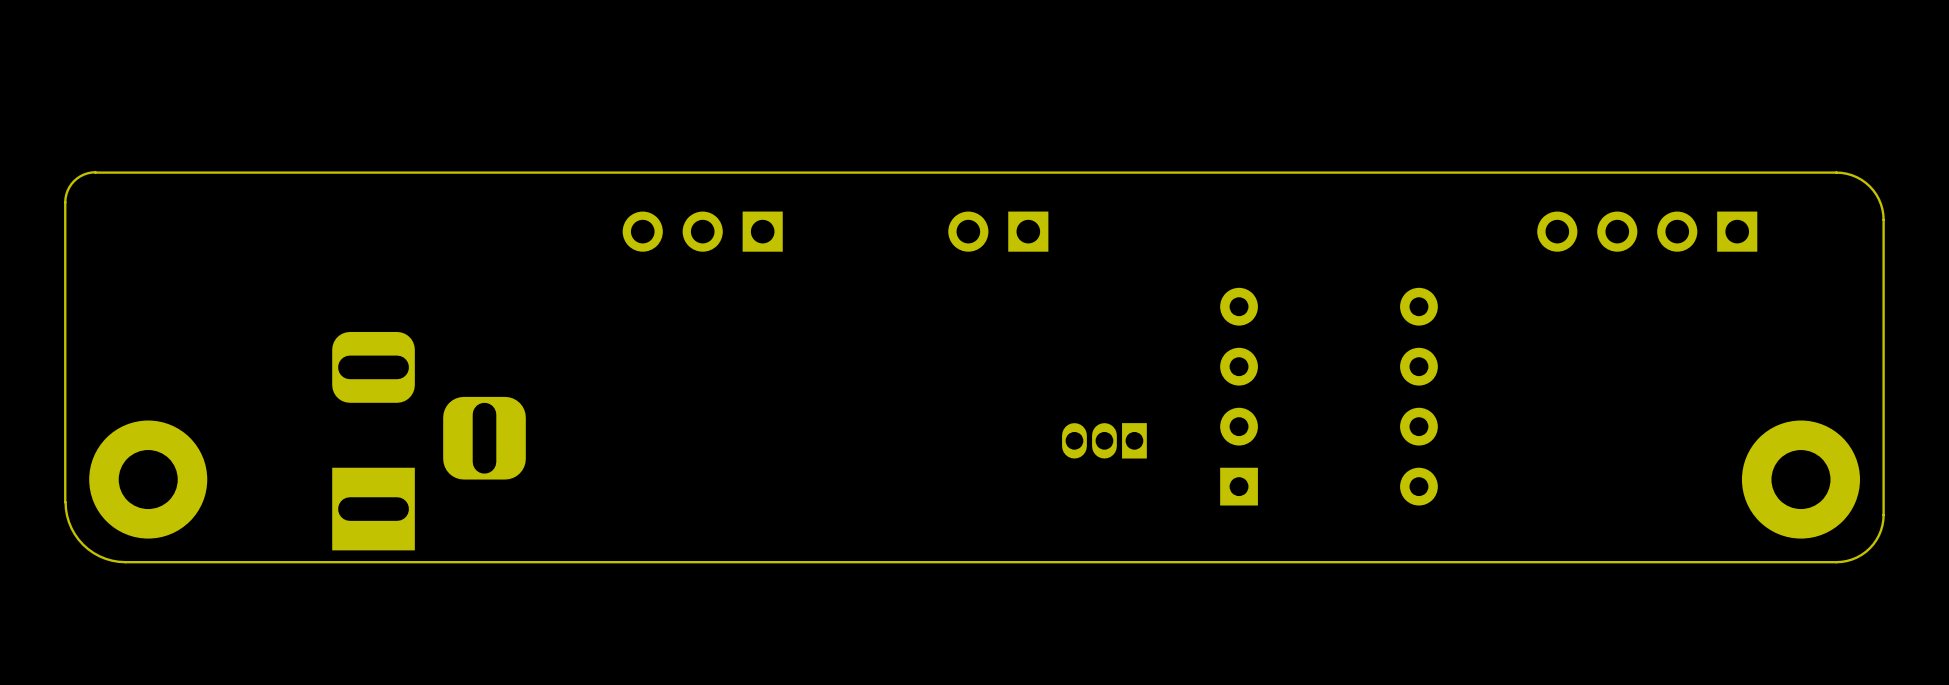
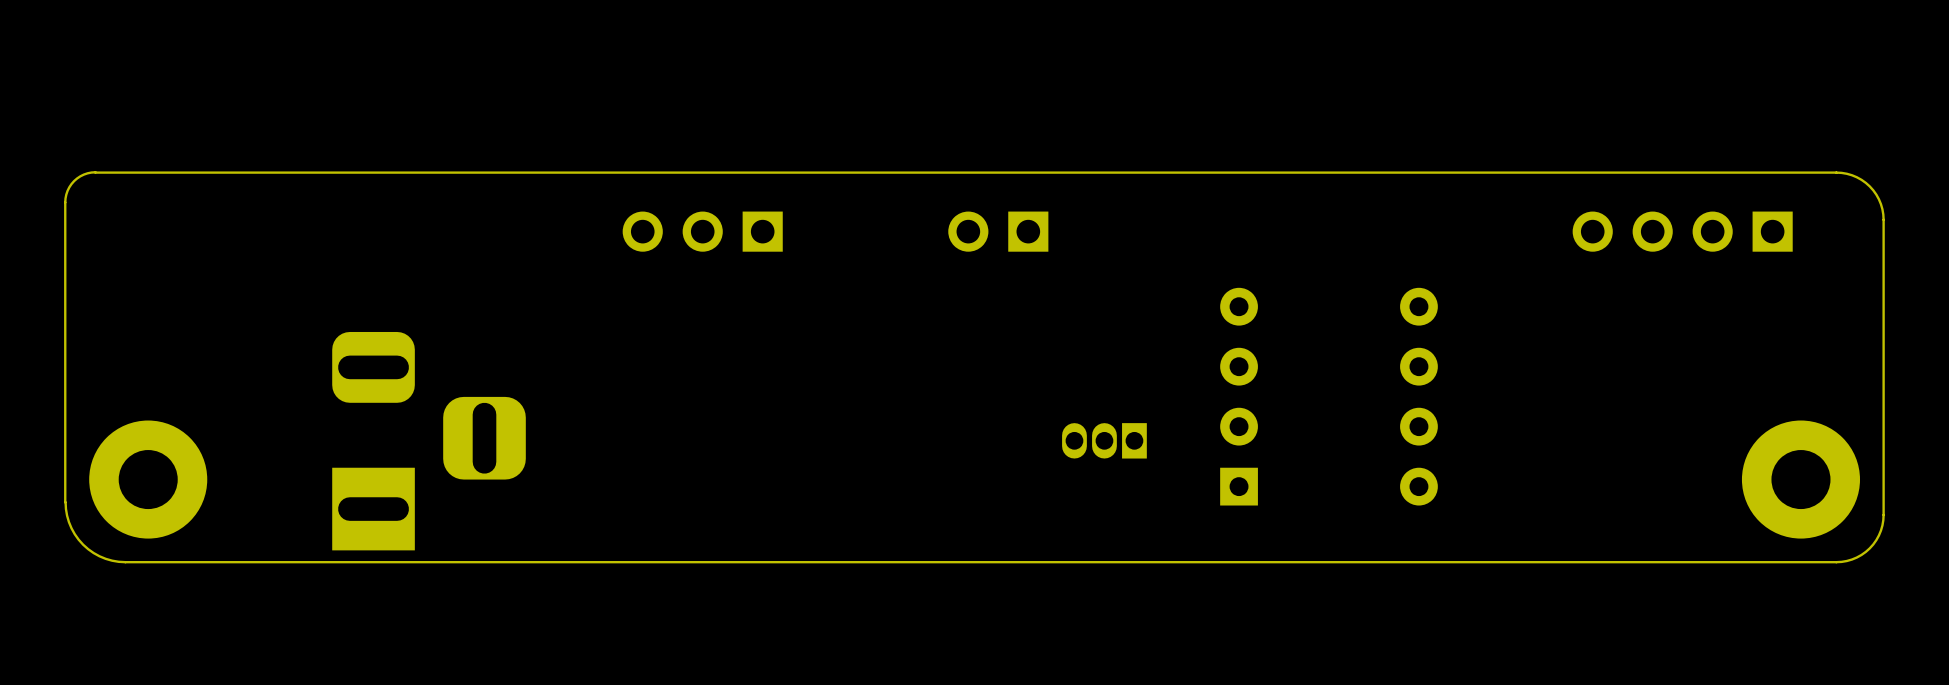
part position: (1647, 231) -> (1682, 231)

